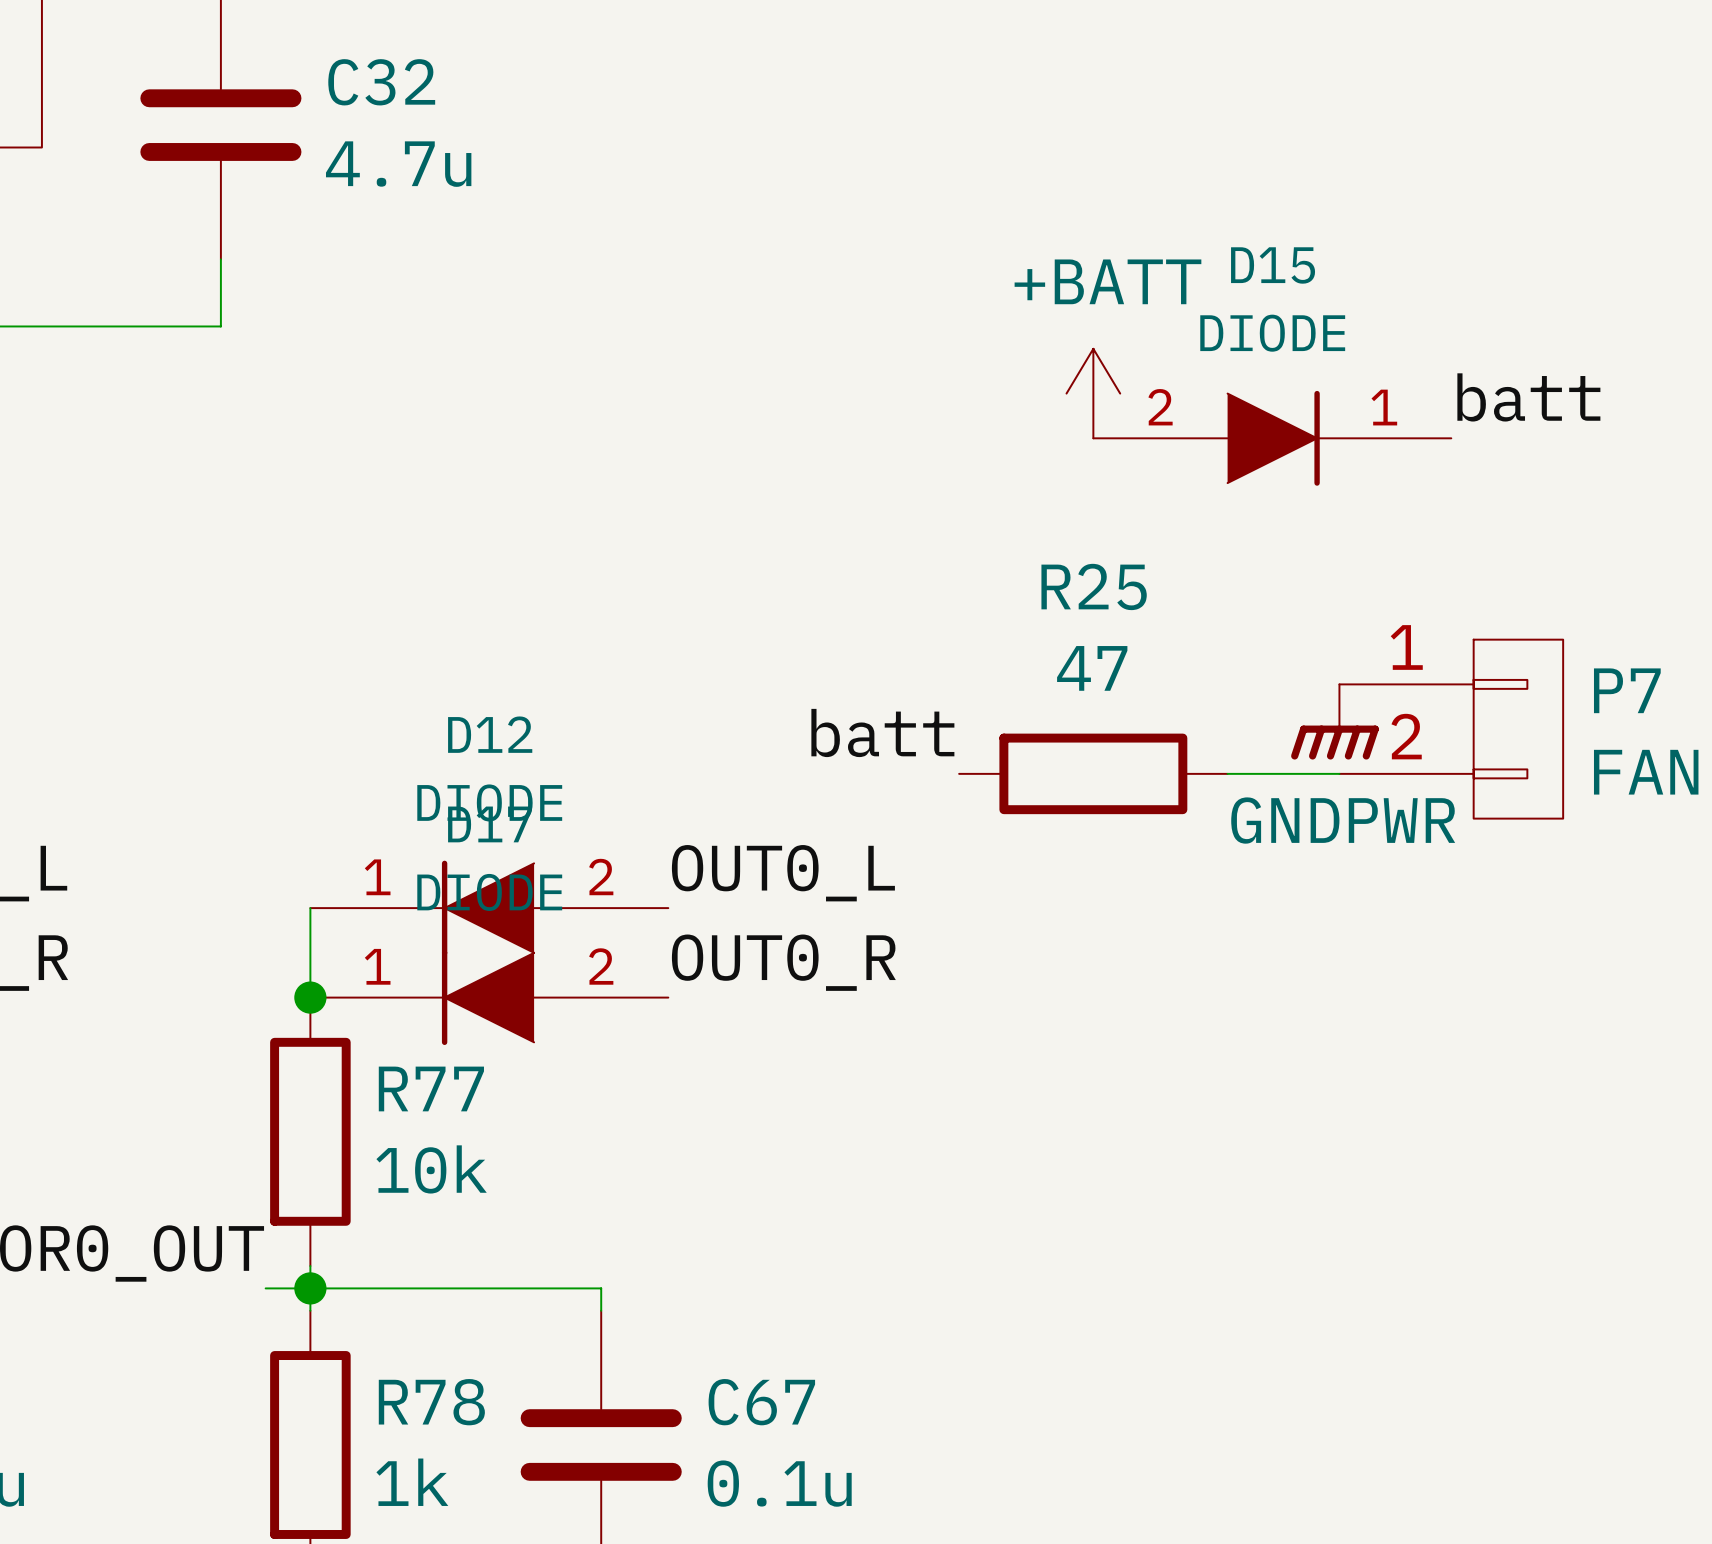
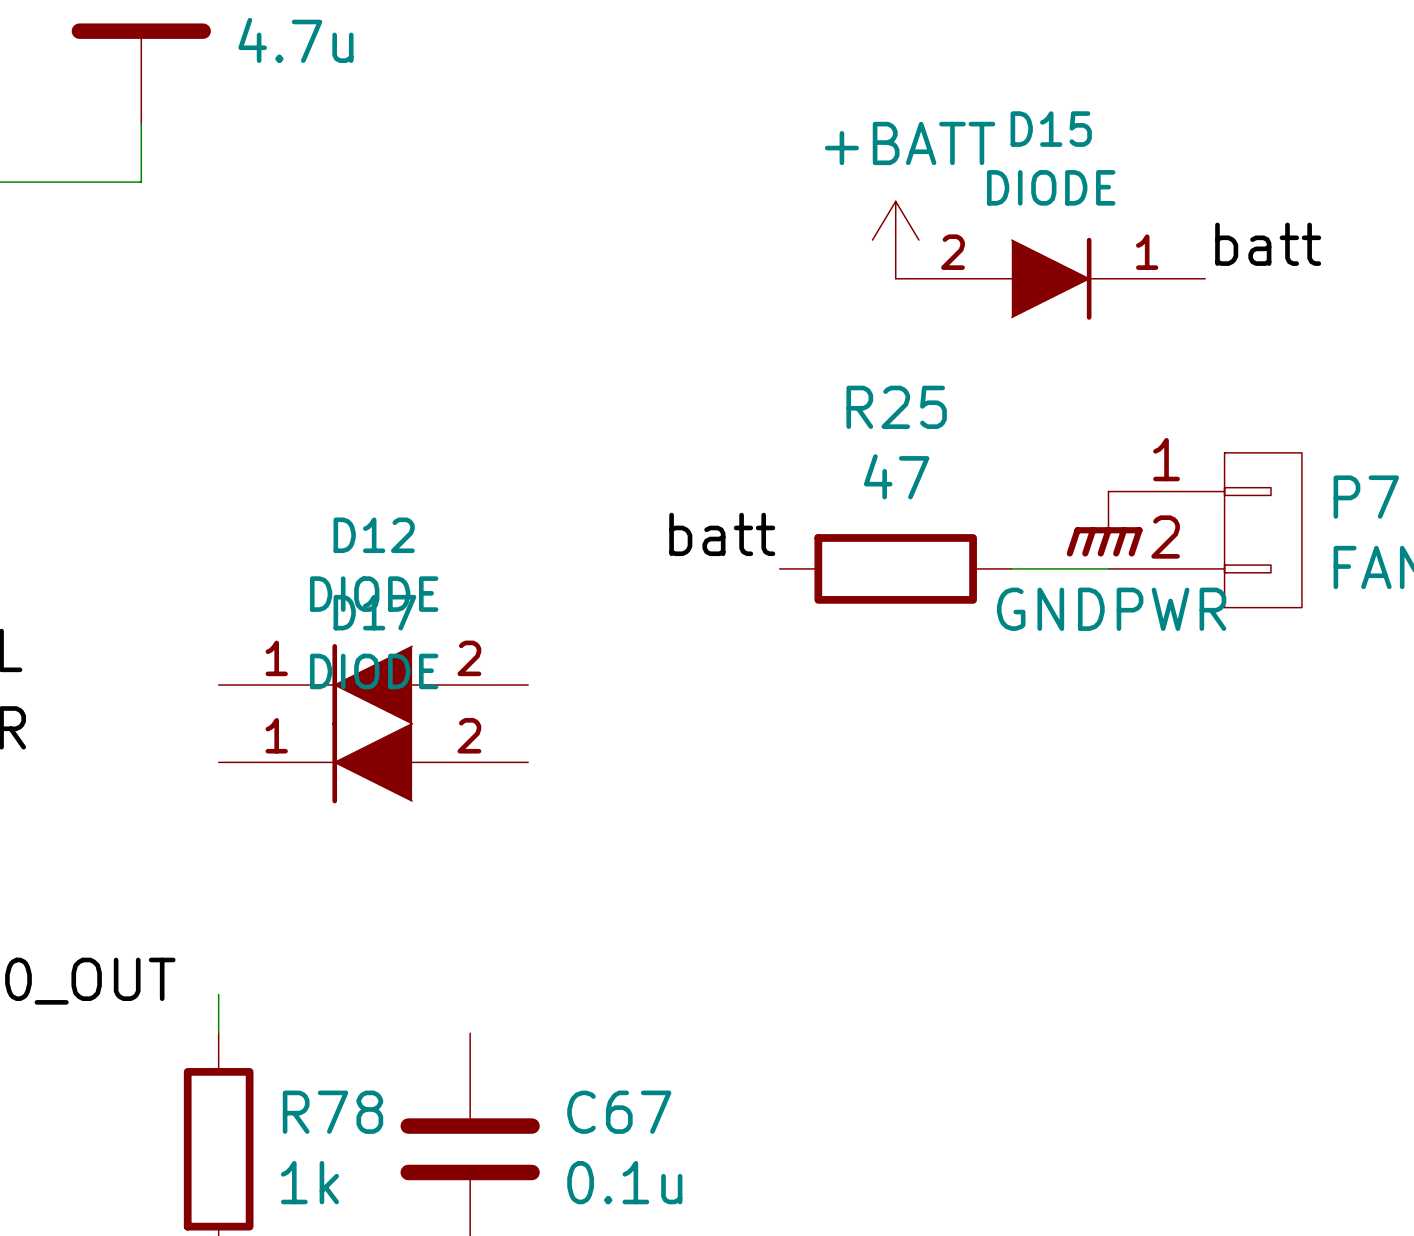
label: OUT0_L (783, 873) -> none
wire: (310, 908) (310, 997) -> none
label: OUT0_R (783, 962) -> none
junction: (310, 997) -> none
R77: 10k (310, 1131) -> none
wire: (265, 1288) (601, 1288) (601, 1310) -> none
junction: (310, 1288) -> none

